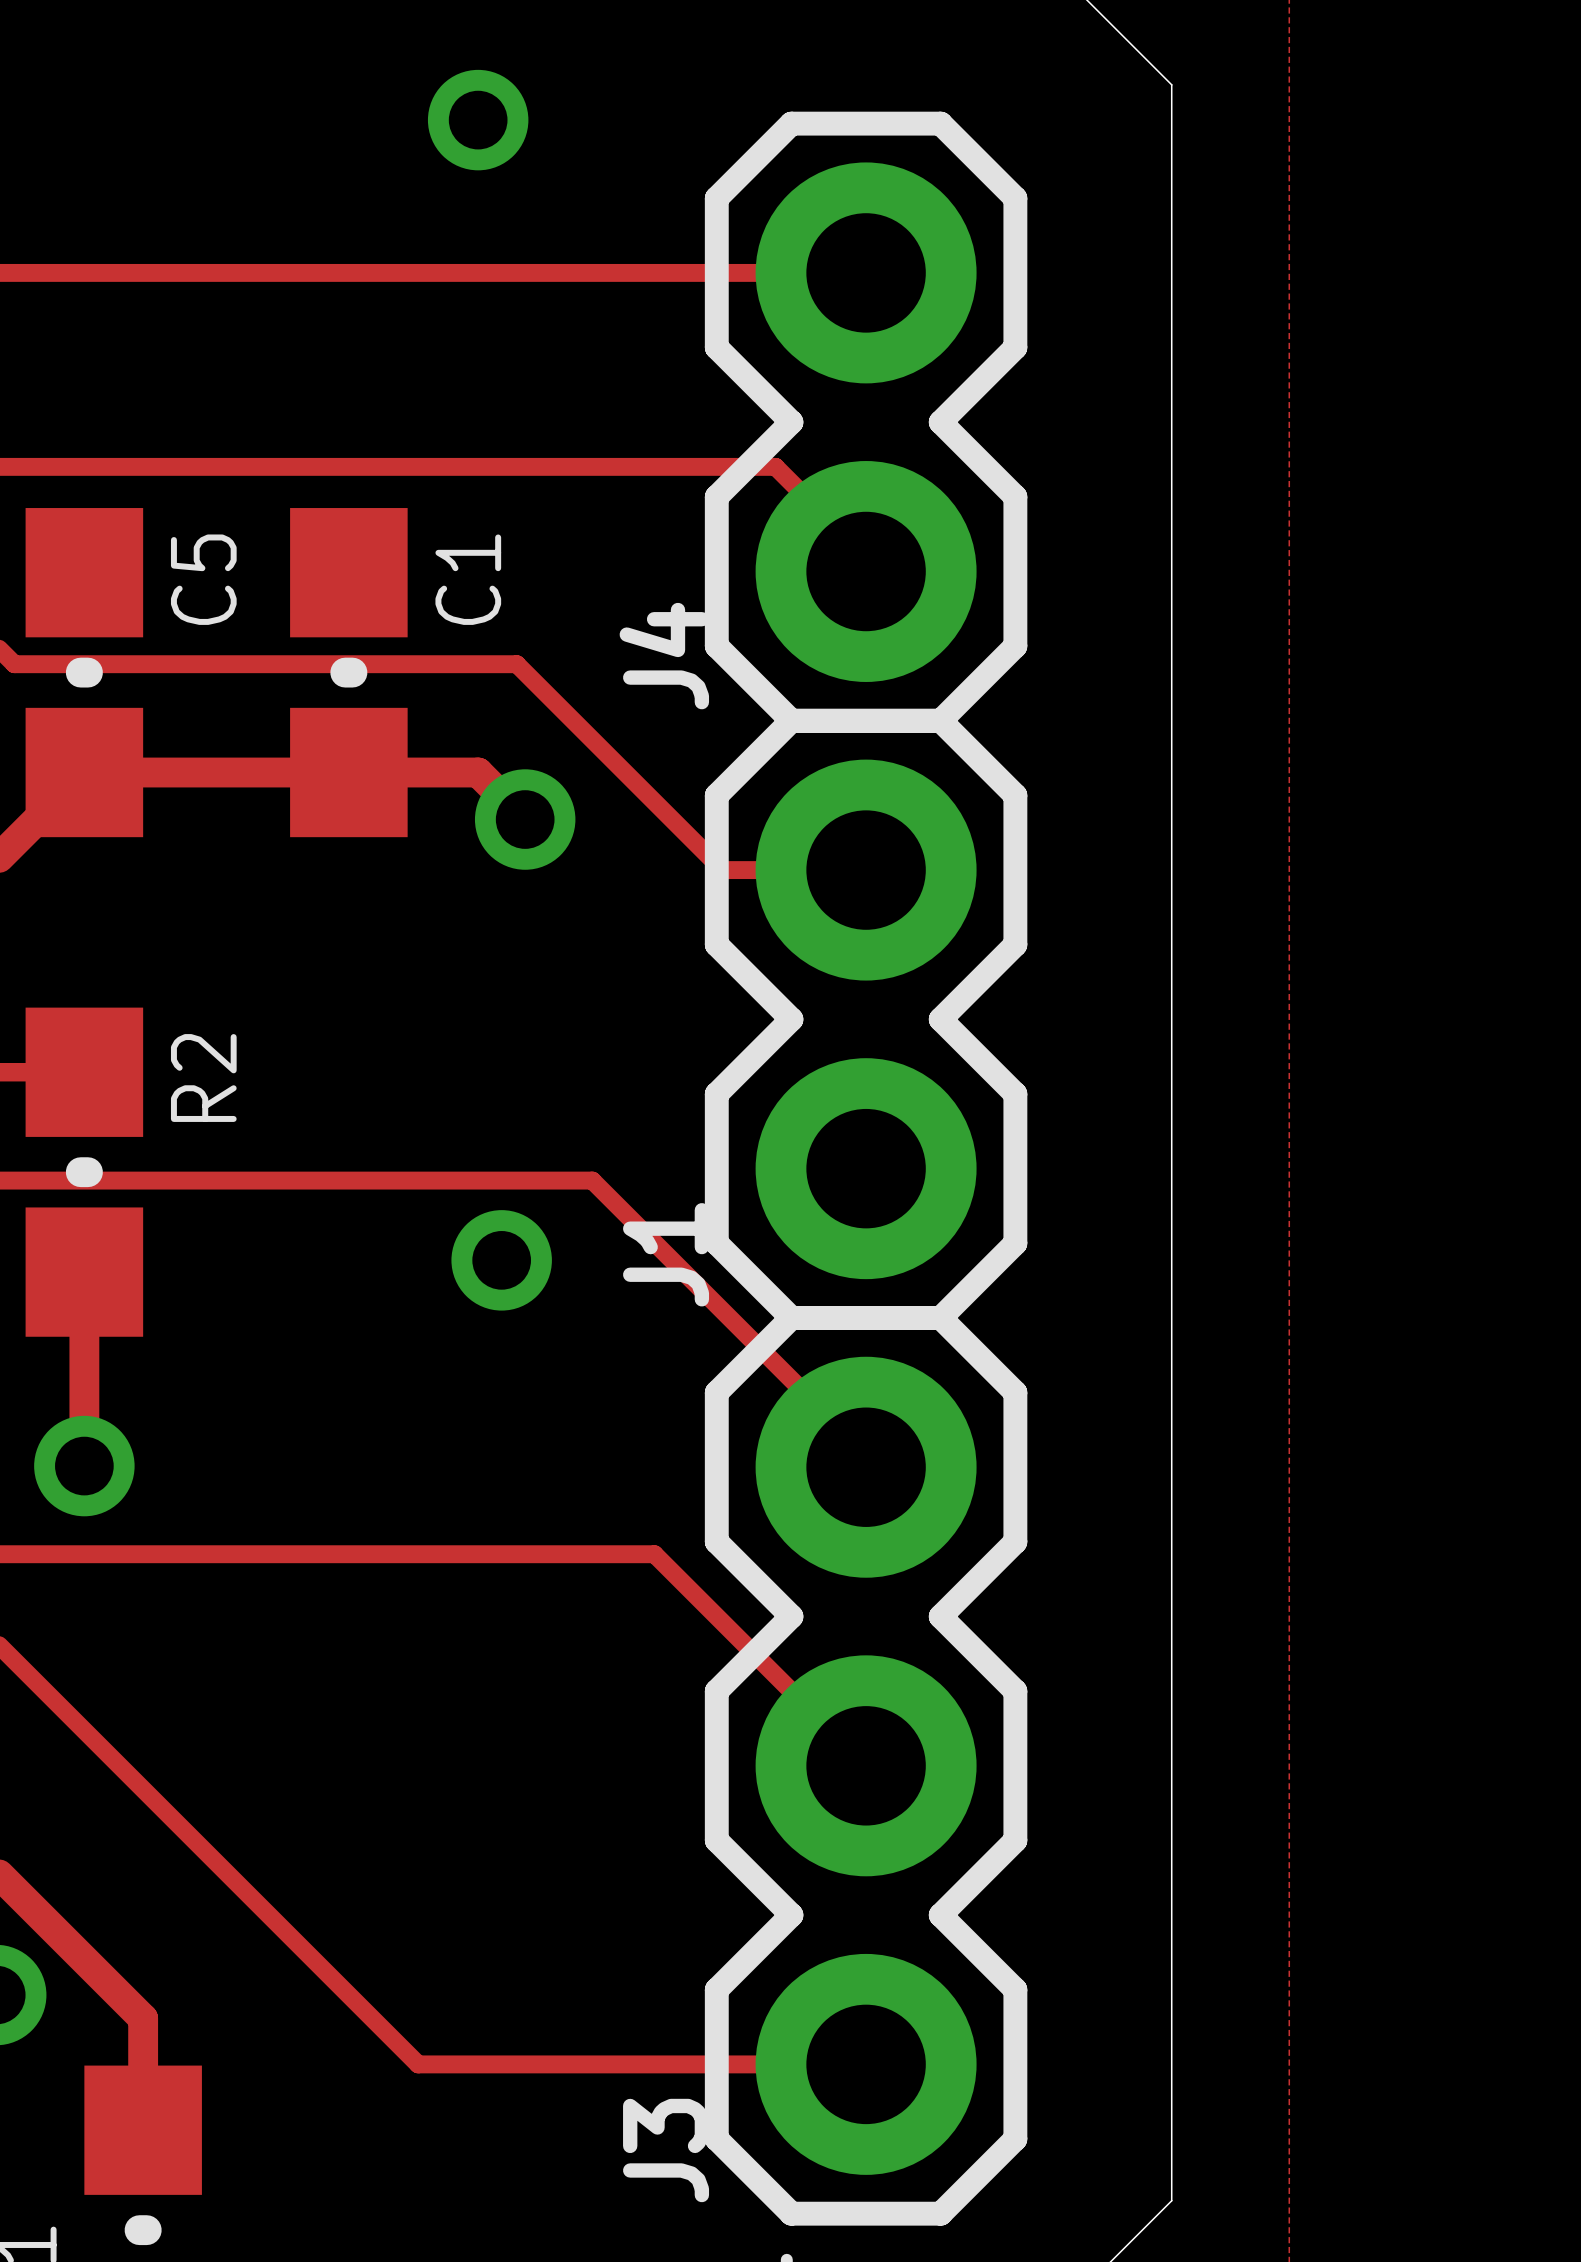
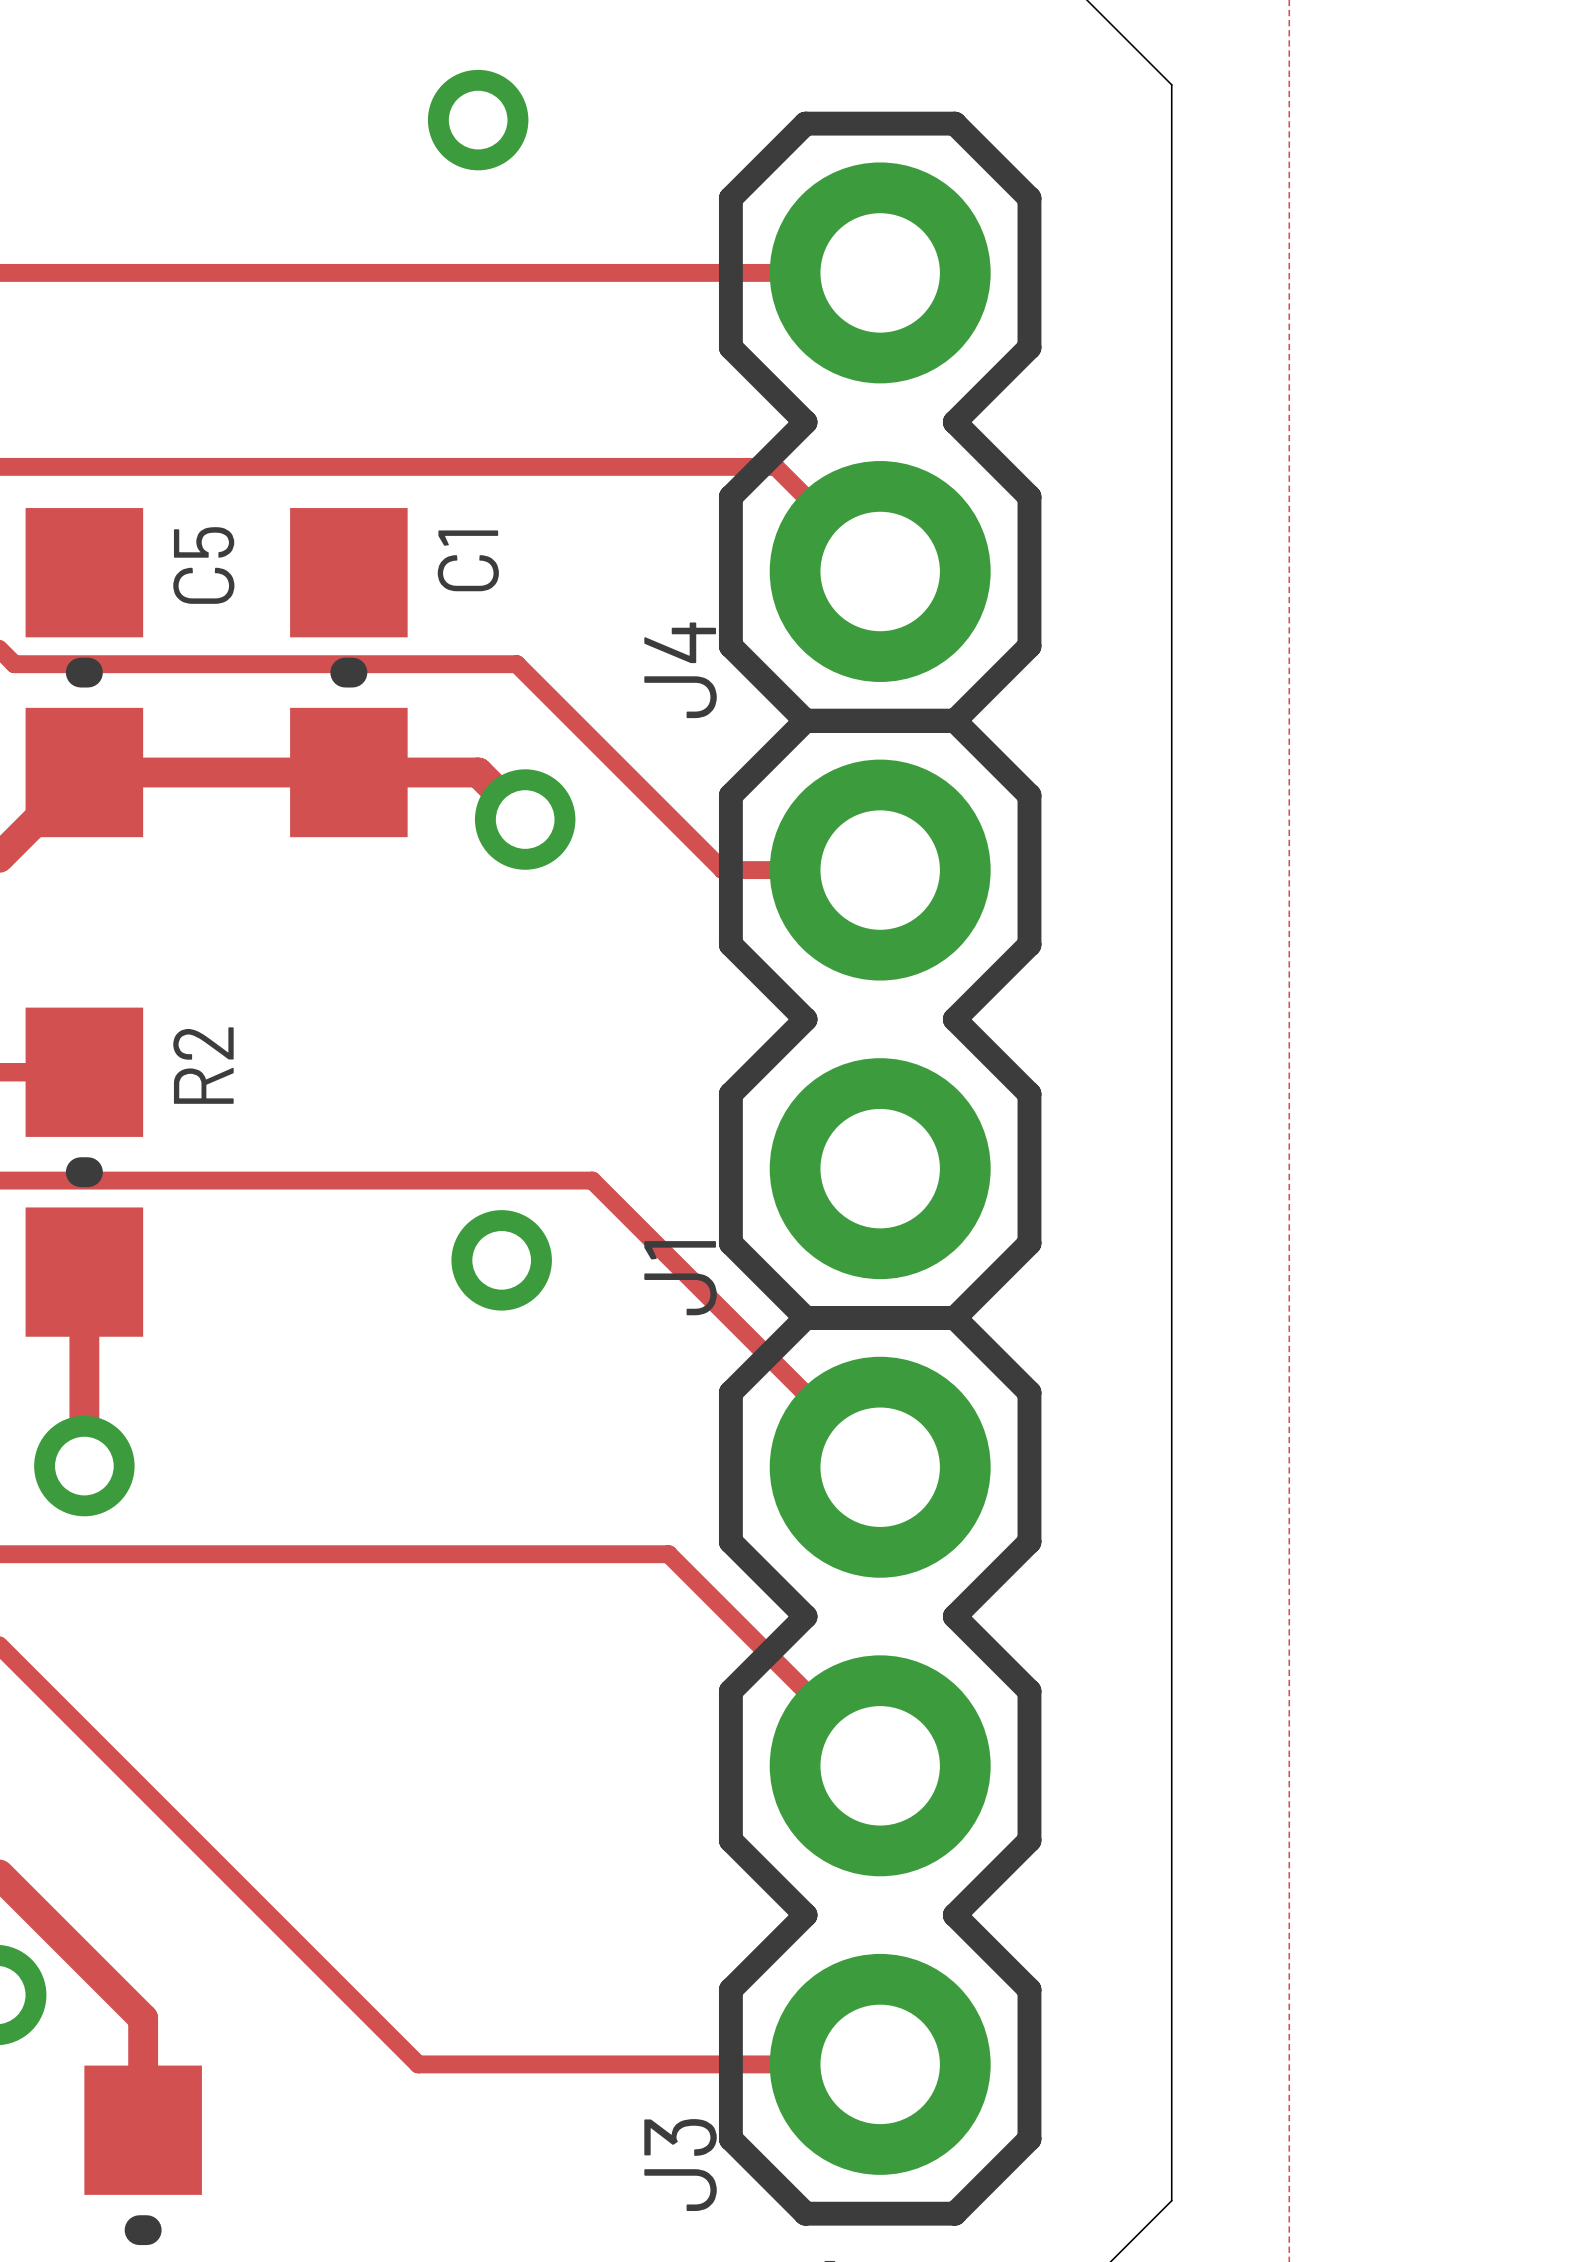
J4 position: (866, 422) -> (880, 422)
J1 position: (866, 1019) -> (880, 1019)
track: (654, 1554) (866, 1765) -> (654, 1554) (668, 1554) (880, 1765)
J3 position: (866, 1765) -> (880, 1765)

